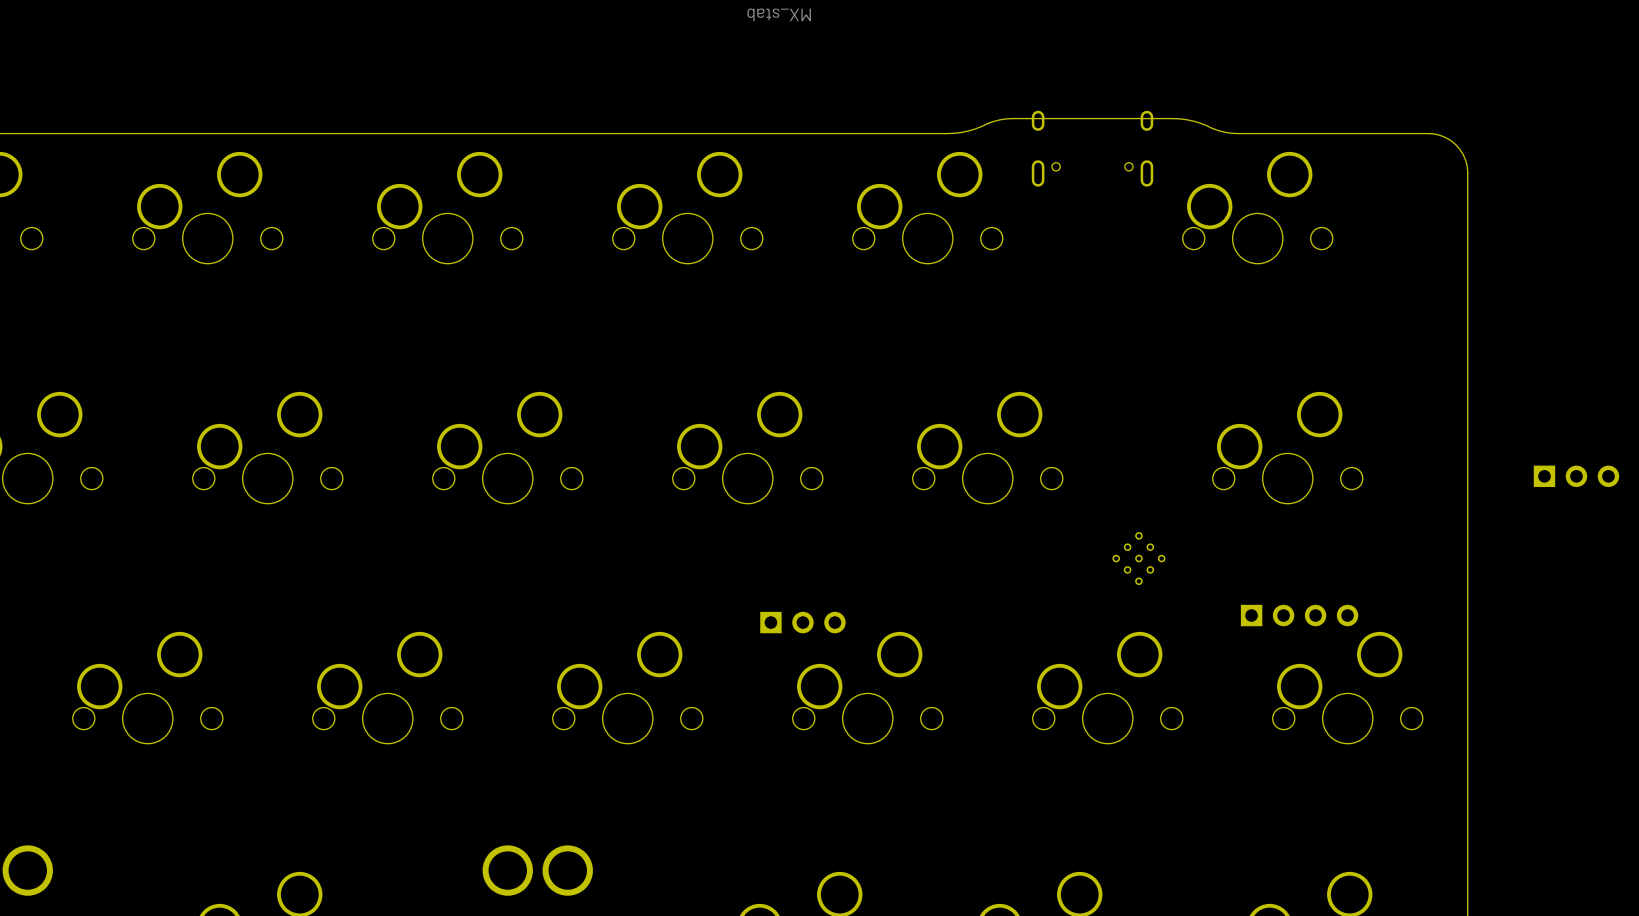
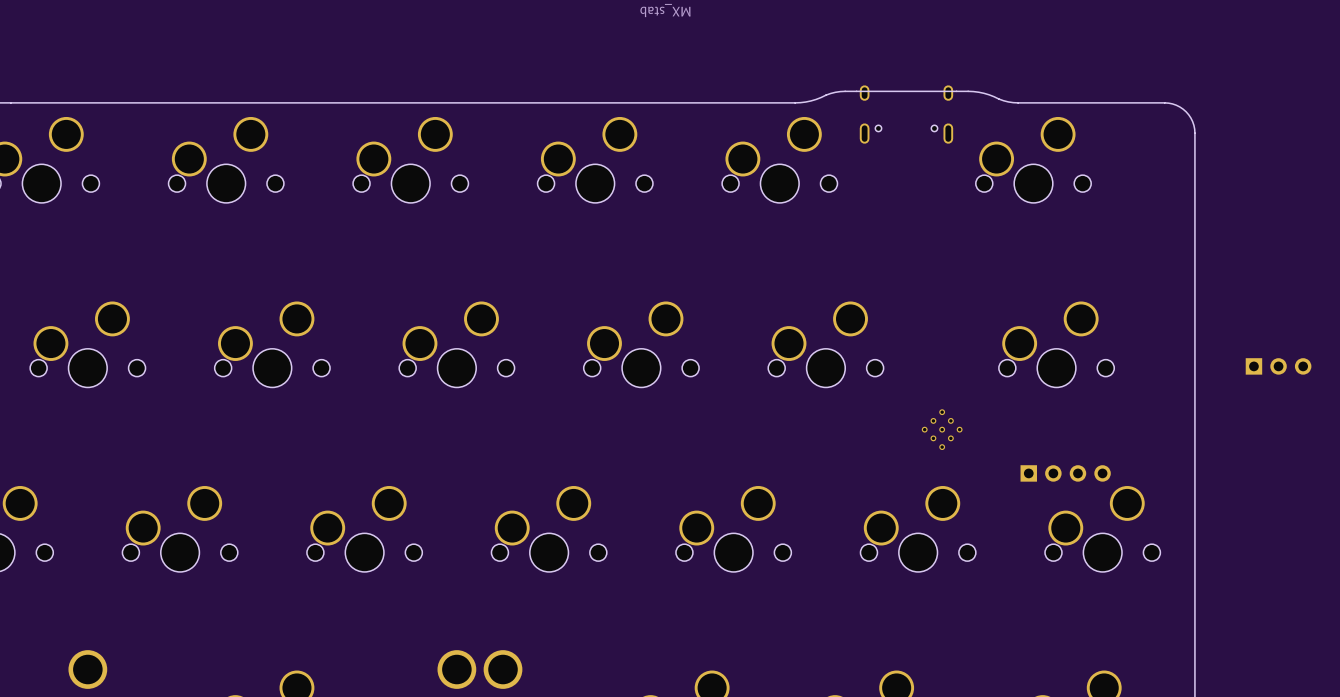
part: (802, 622) -> none

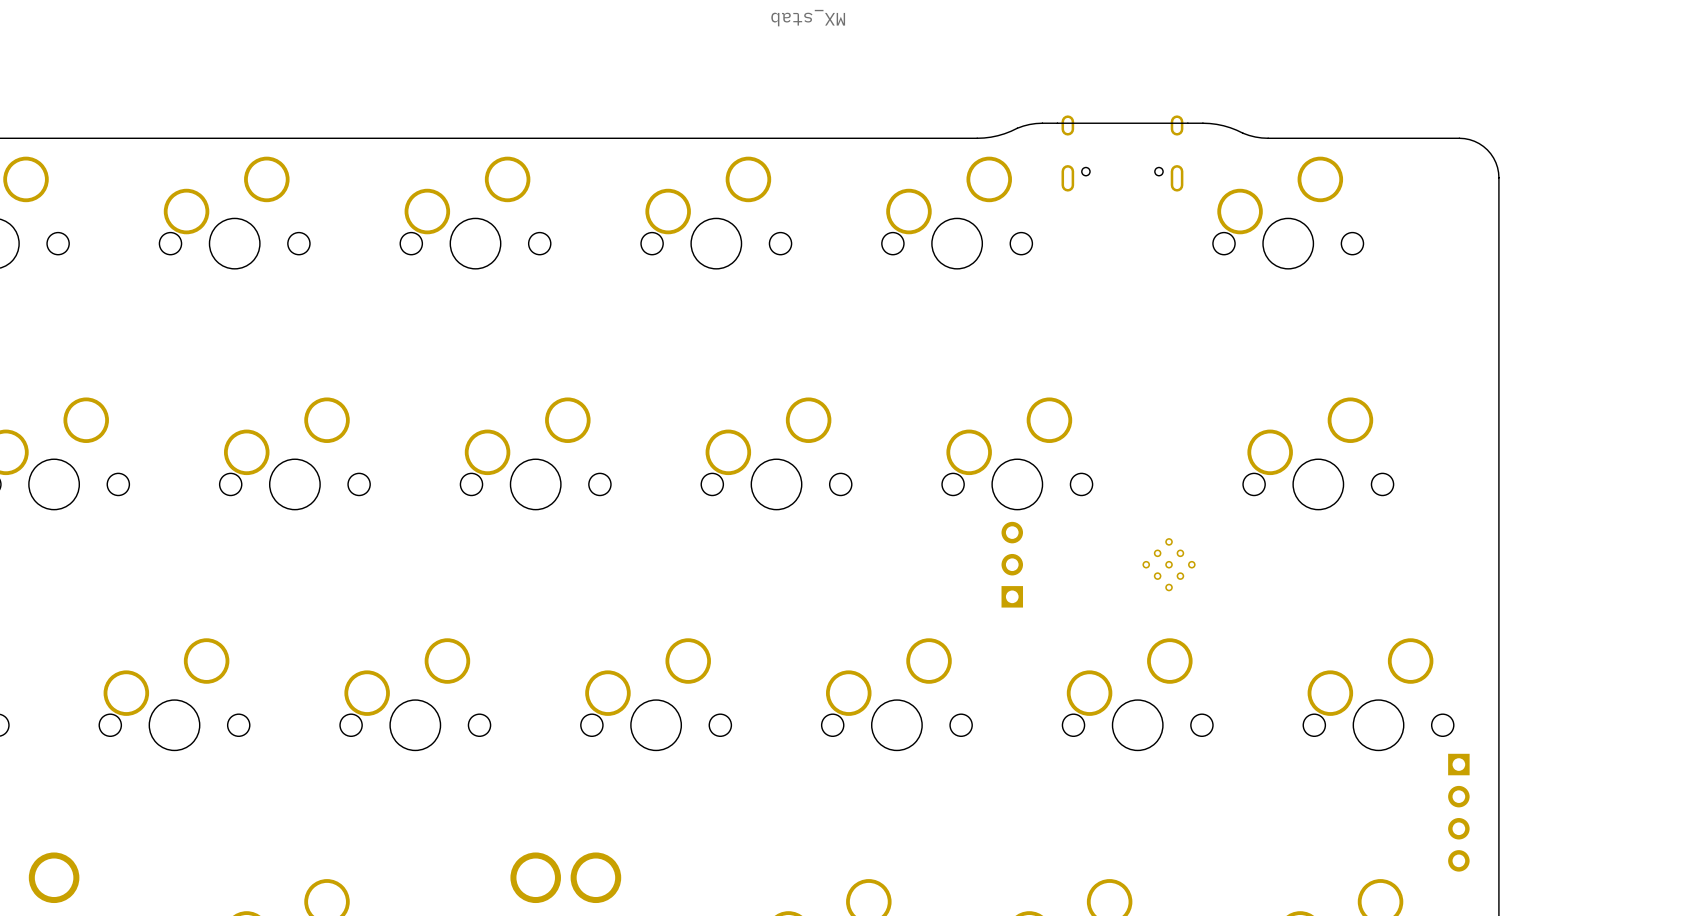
part: (1278, 366) -> none
part: none -> (1012, 564)
part rotation: 0° (1065, 473) -> 90° clockwise (1458, 812)
part position: (1065, 473) -> (1458, 812)

